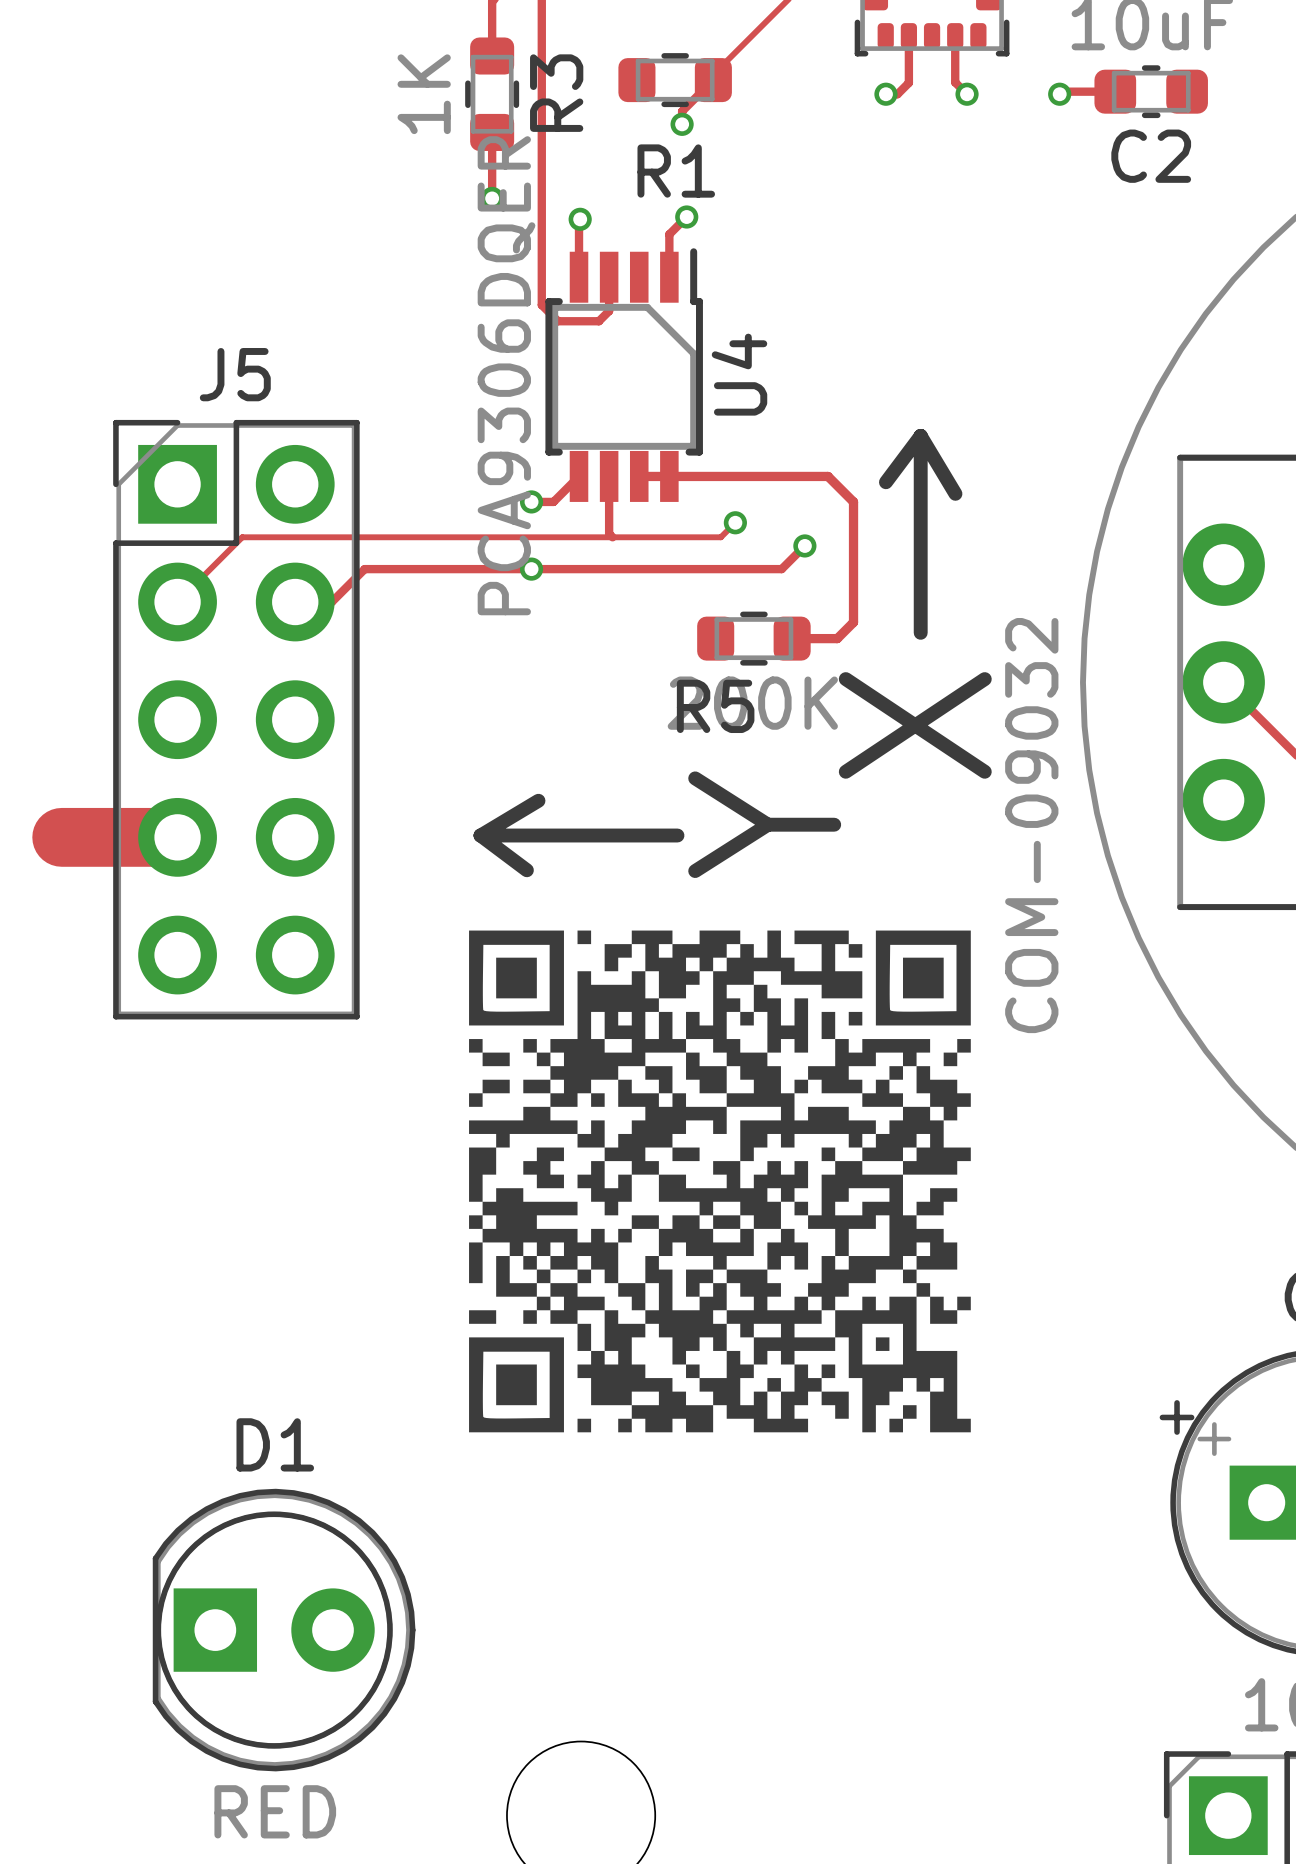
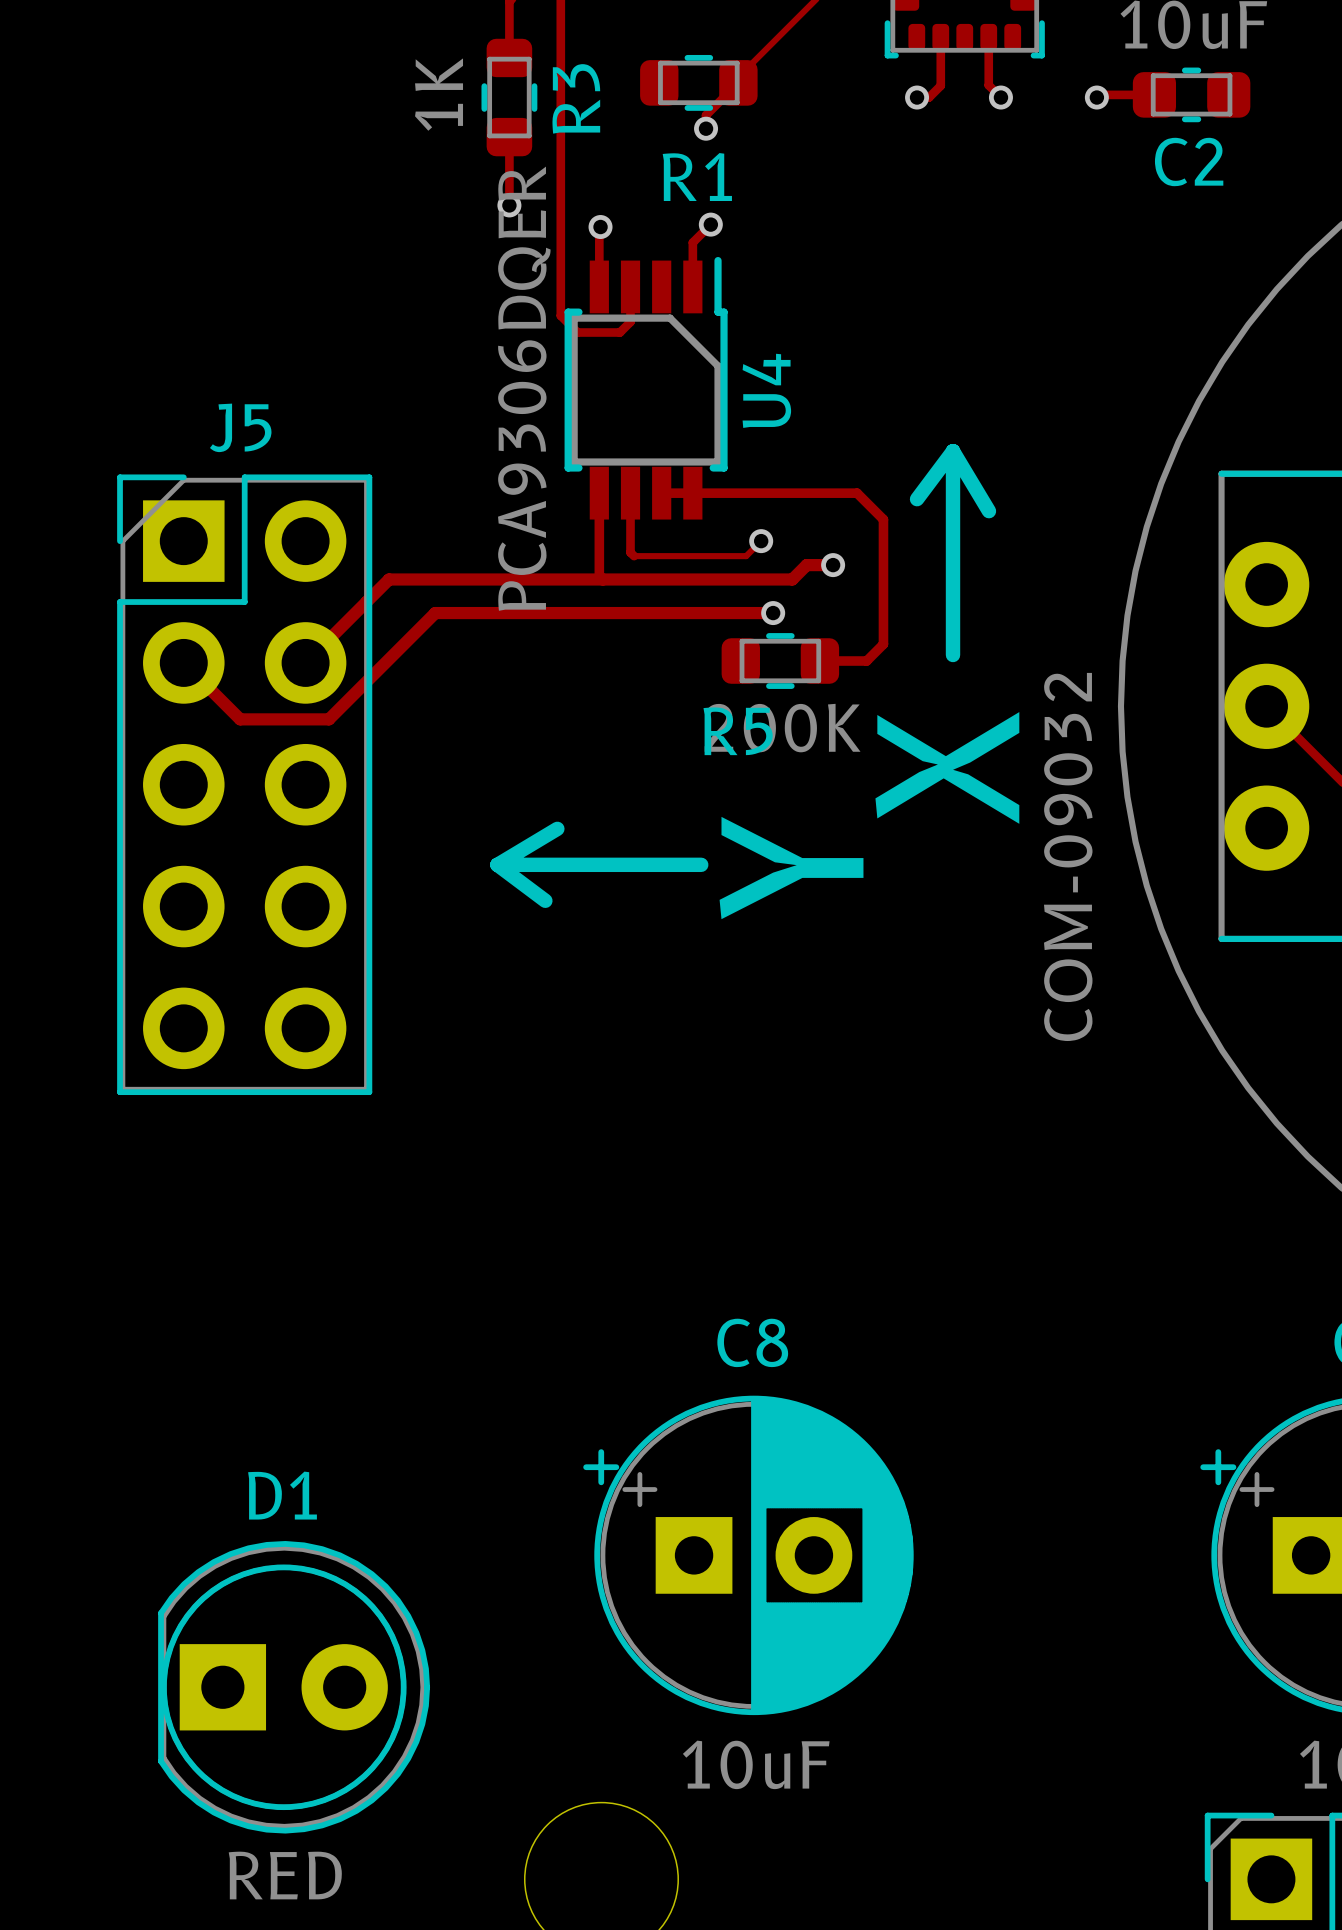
track: (579, 476) (553, 501) (531, 501) -> (599, 493) (599, 575) (602, 579)
via: (531, 501) -> none
track: (612, 537) (242, 537) (177, 602) -> none
track: (804, 545) (781, 569) (364, 569) (331, 602) (295, 602) -> (833, 565) (806, 565) (792, 579) (389, 579) (305, 662)
via: (531, 569) -> none
track: none -> (773, 613) (435, 613) (328, 719) (240, 719) (183, 662)
via: none -> (773, 613)
J5 position: (236, 719) -> (244, 784)
track: (61, 837) (177, 837) -> none
drawing: [469, 930, 971, 1433] -> none
C8: none -> 10uF (748, 1555)

